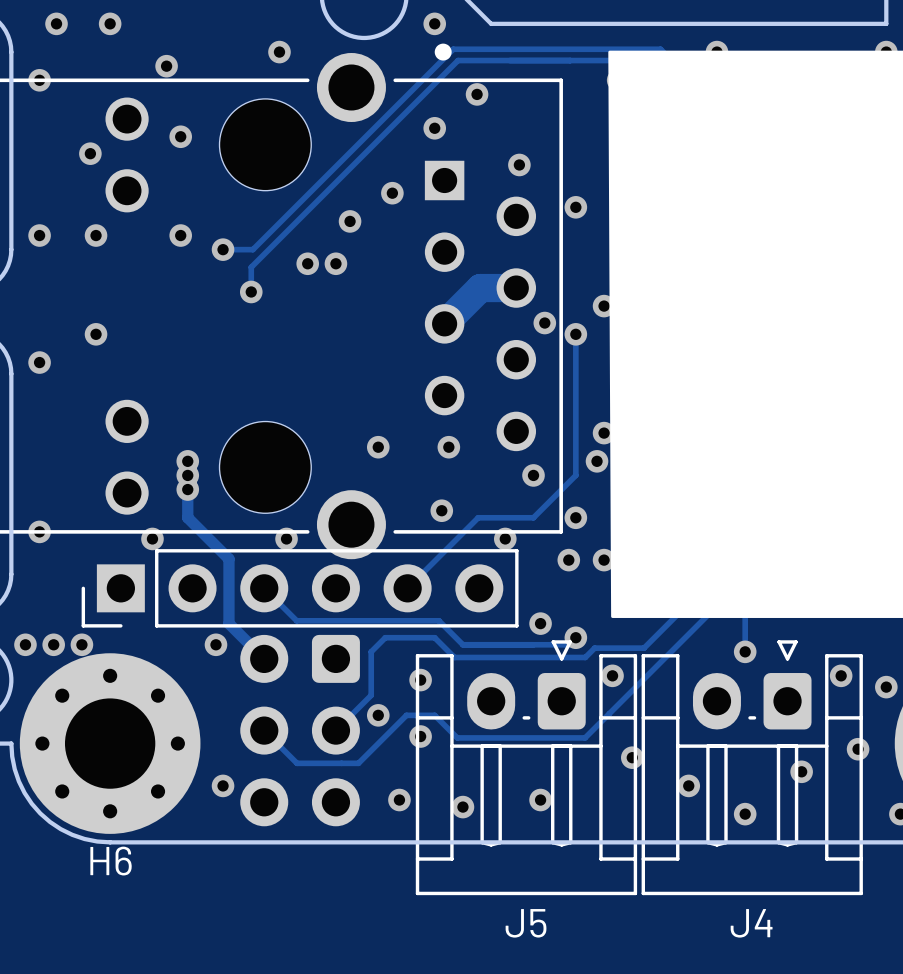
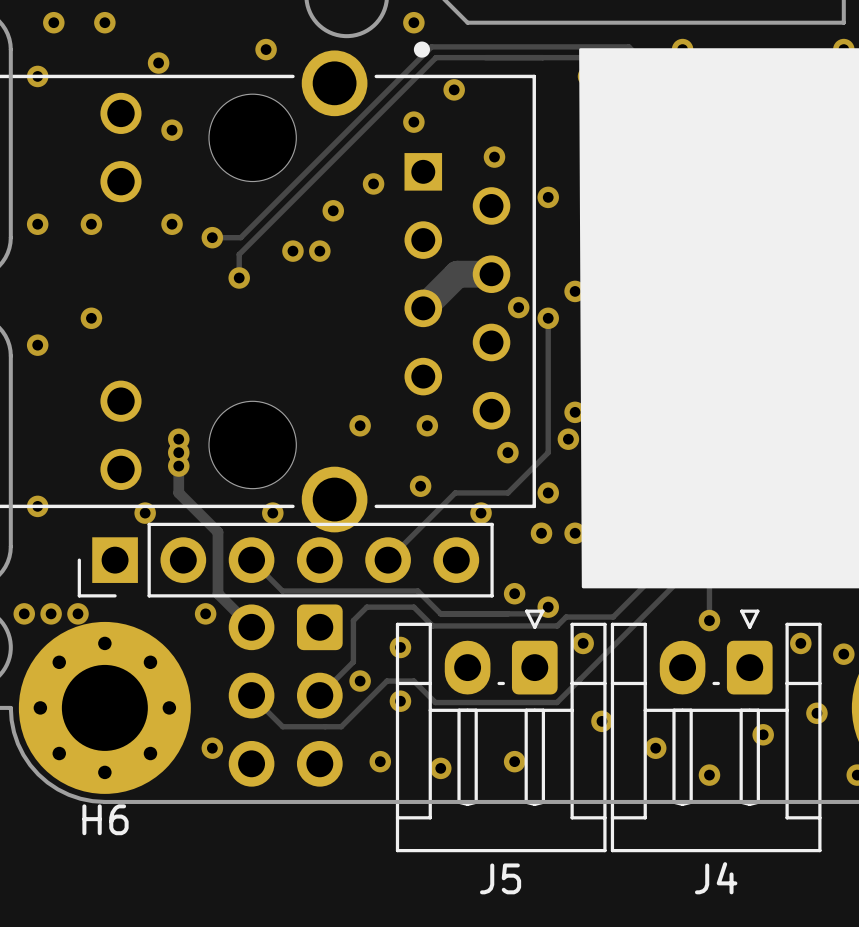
via: (90, 153) -> none

